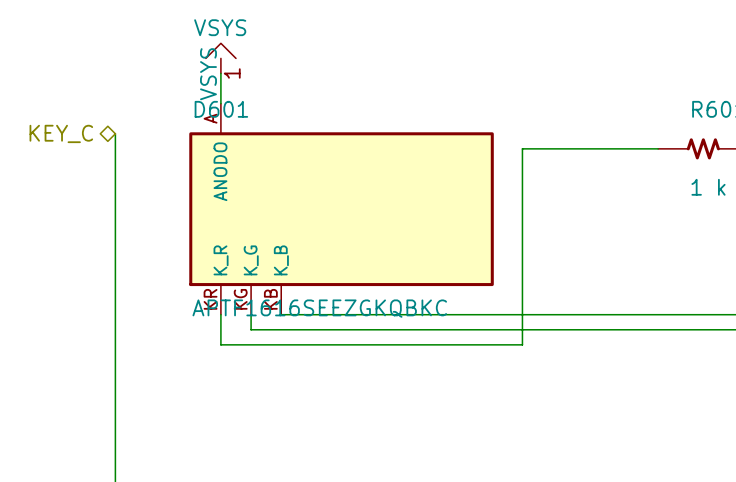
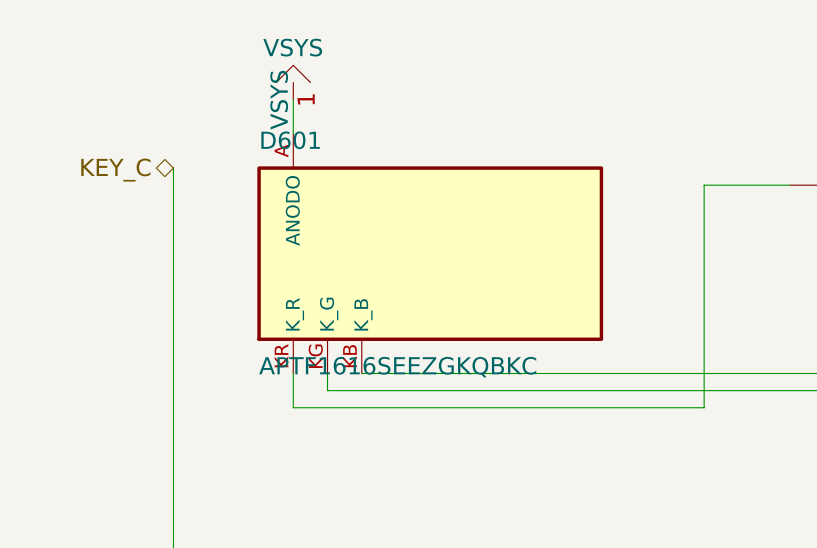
wire: (582, 148) (522, 148) (522, 344) -> (704, 185) (704, 407) (635, 407)

